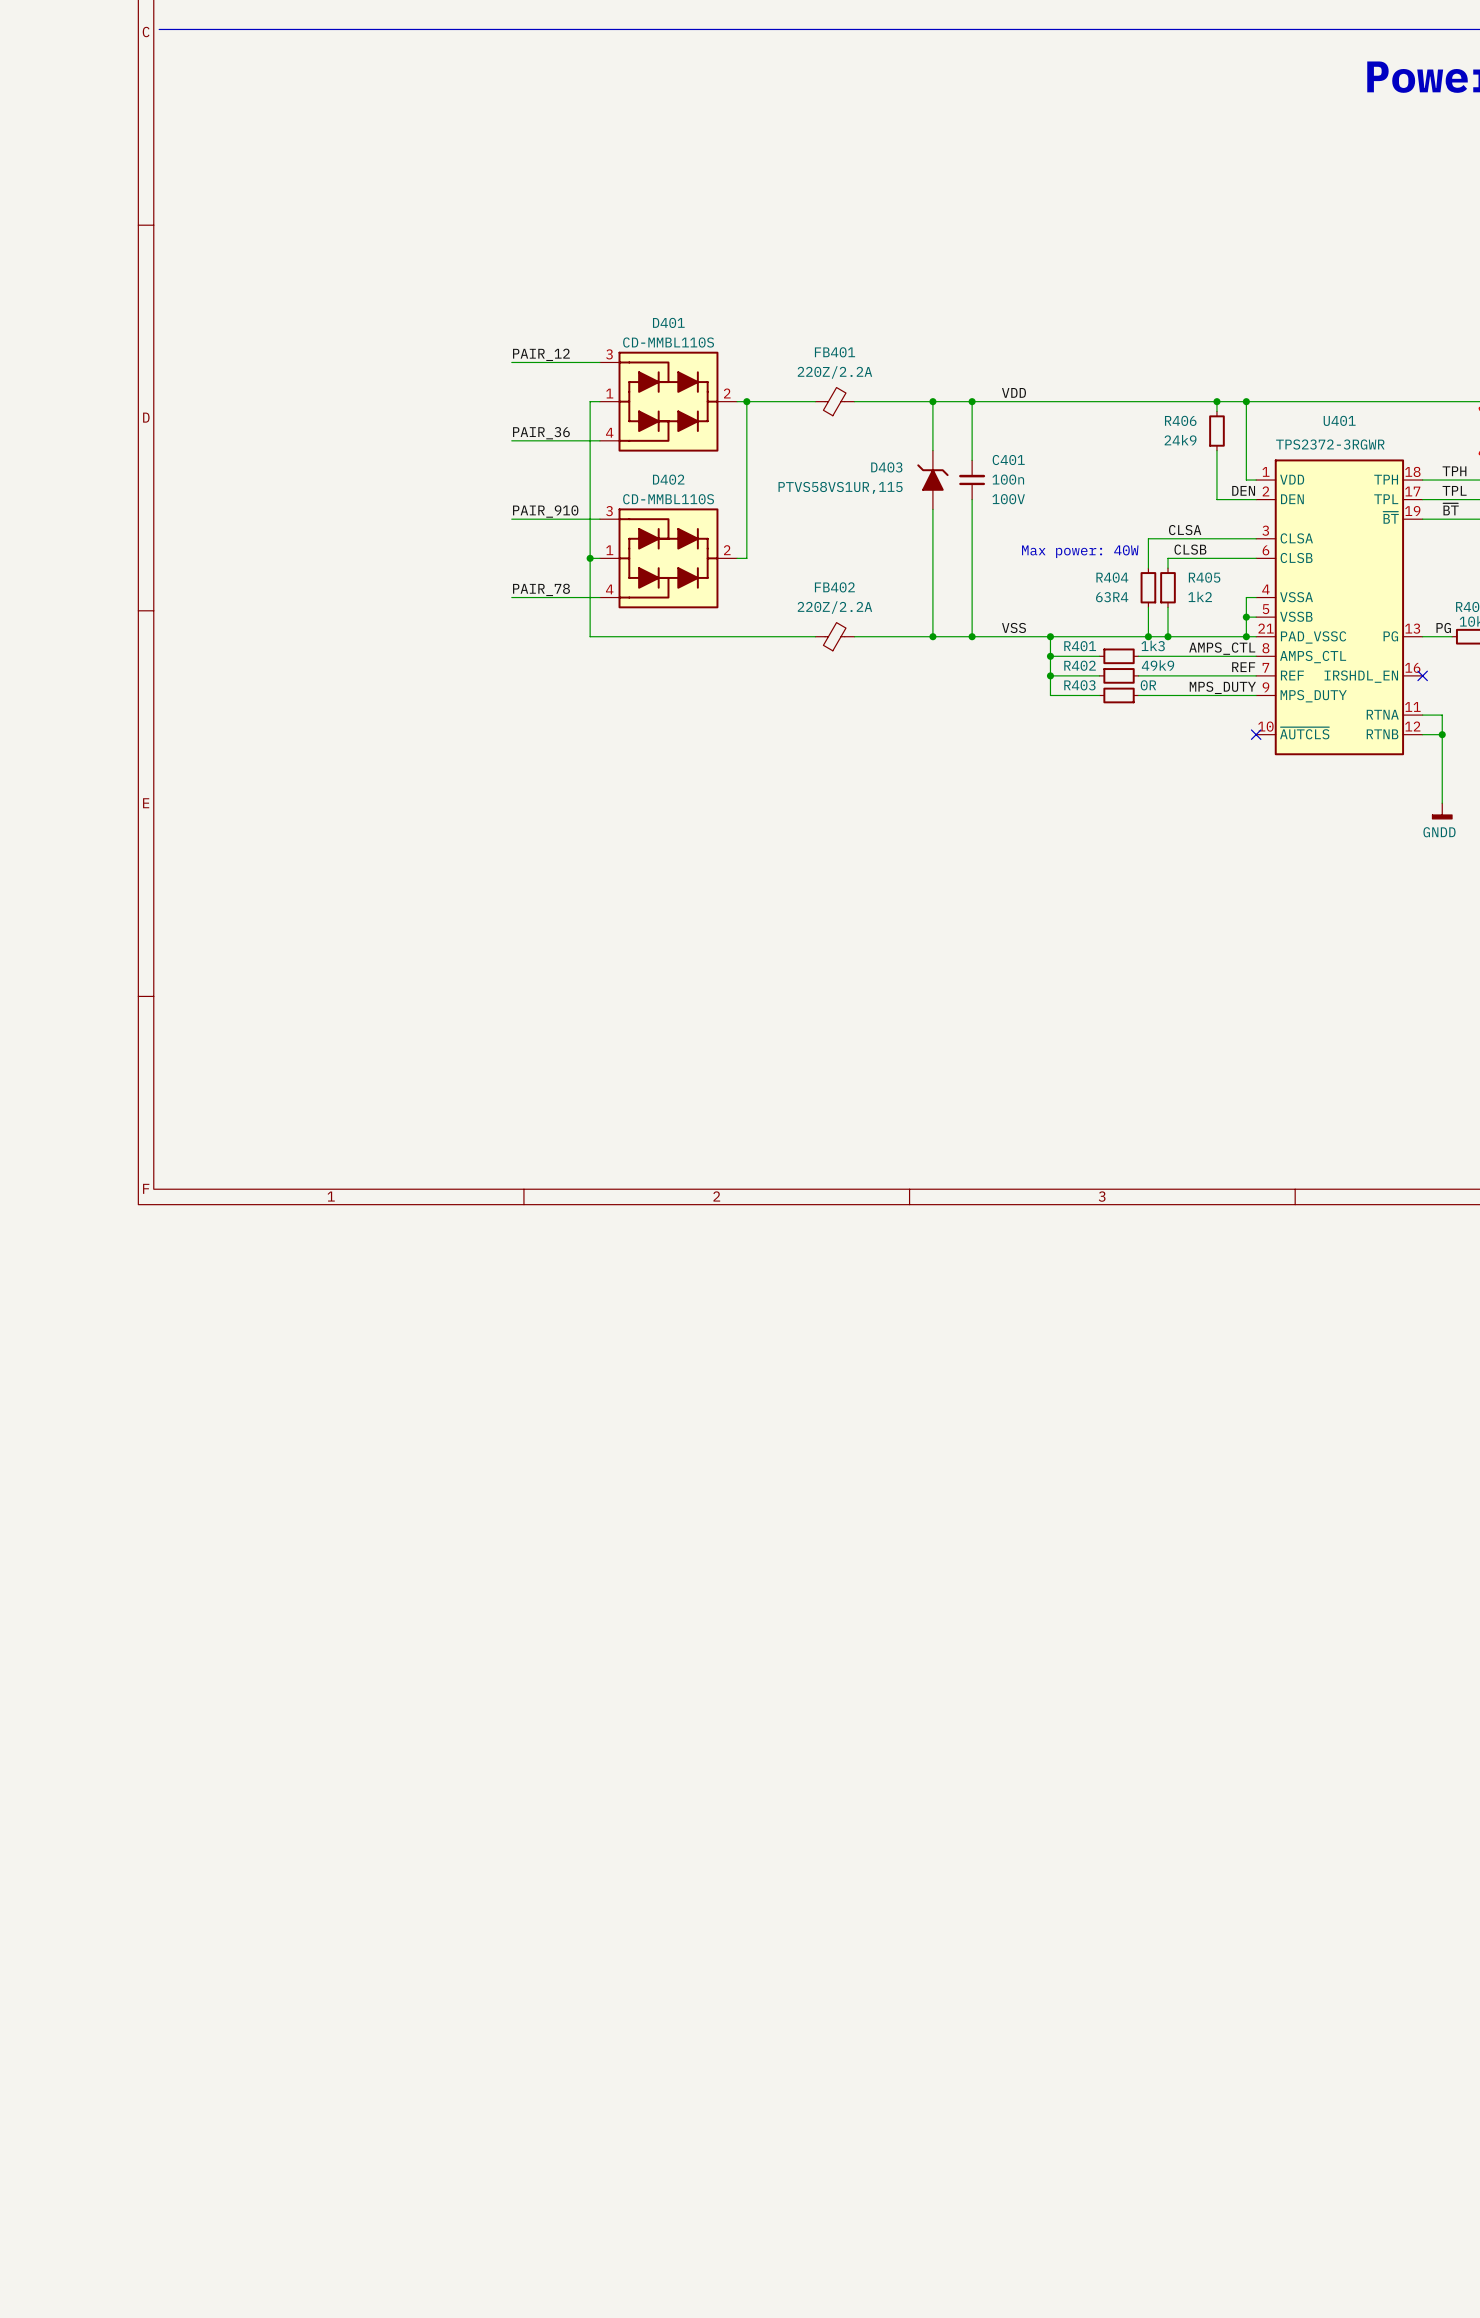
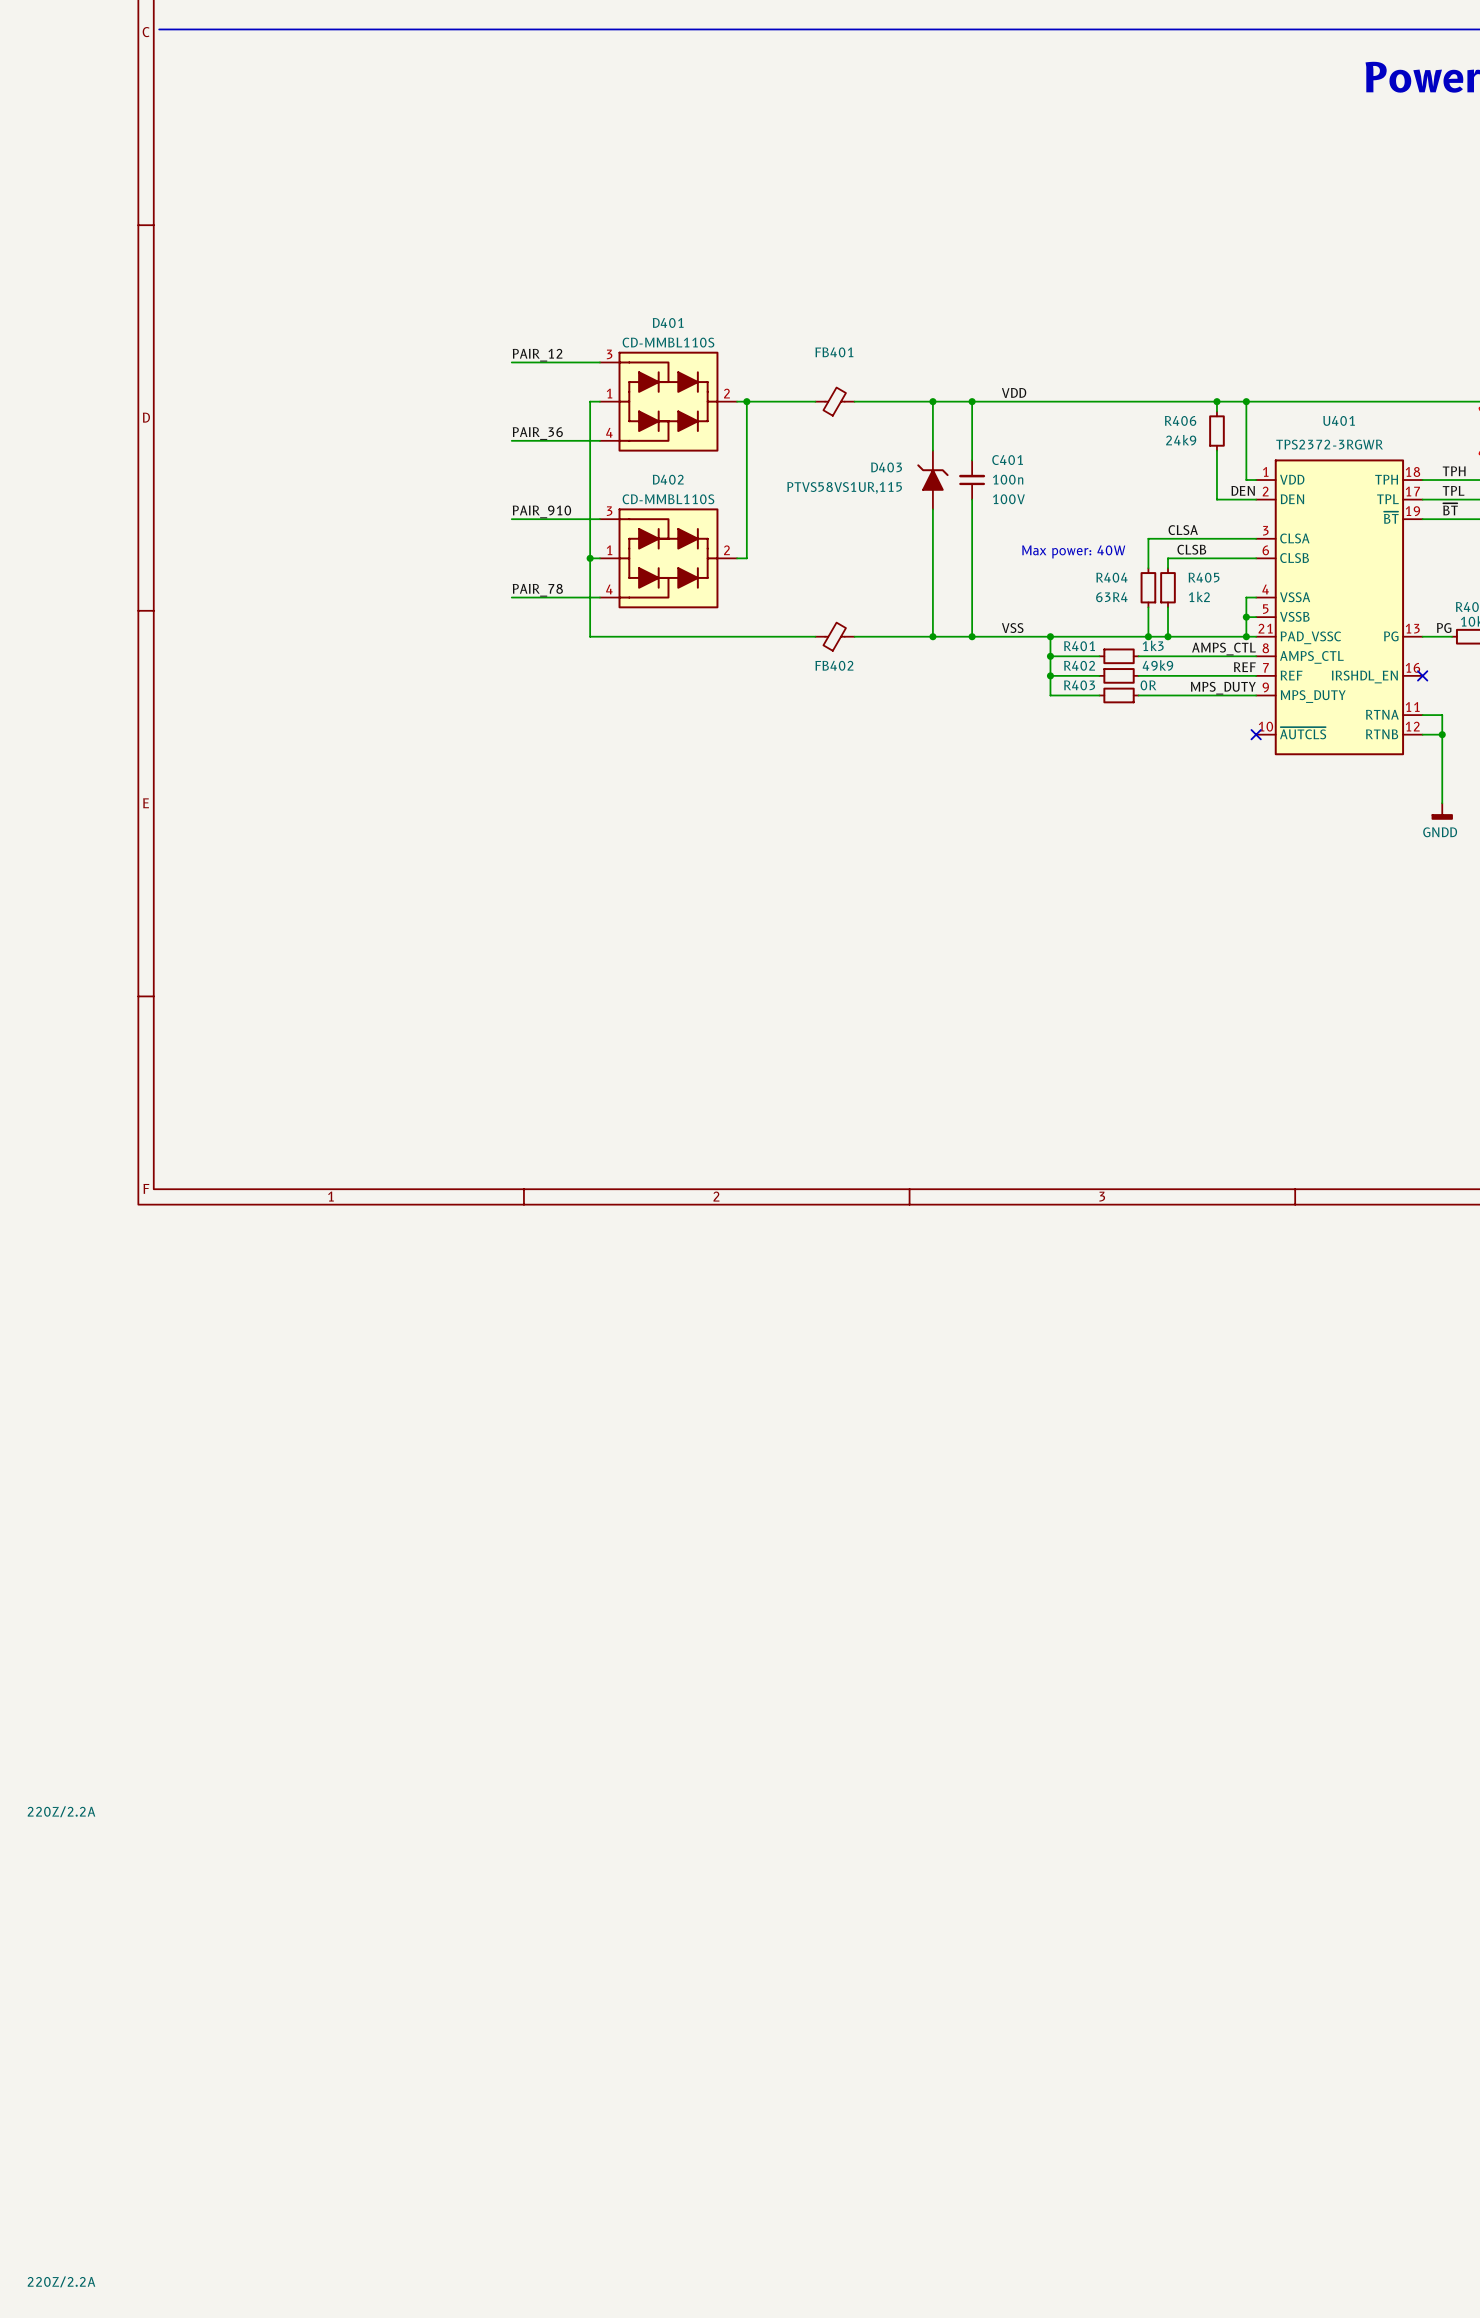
FB401 text position: 220Z/2.2A (834, 372) -> 220Z/2.2A (61, 1811)
FB402 name position: FB402 (834, 587) -> FB402 (834, 665)
FB402 text position: 220Z/2.2A (834, 607) -> 220Z/2.2A (61, 2281)

